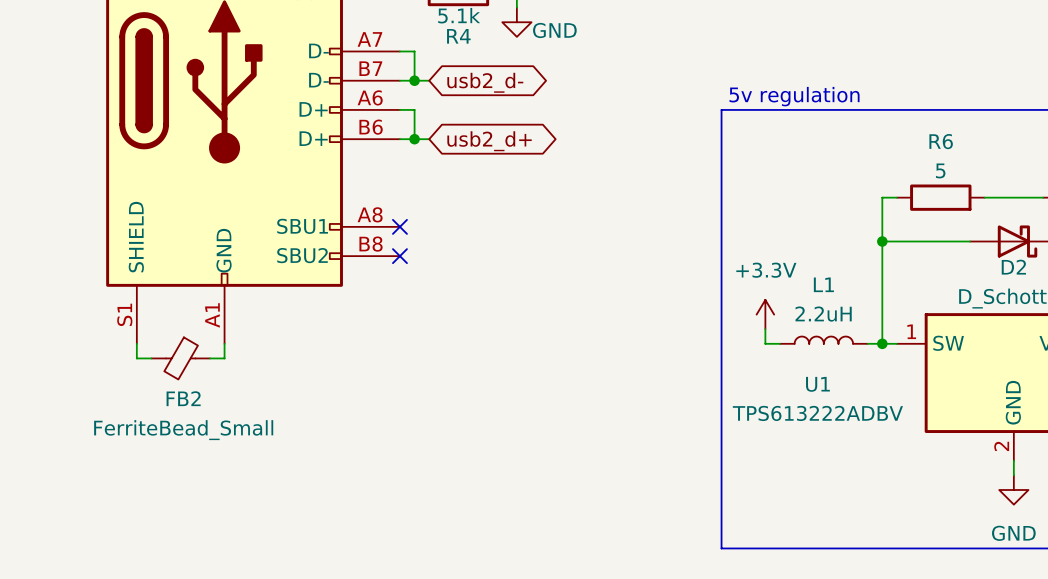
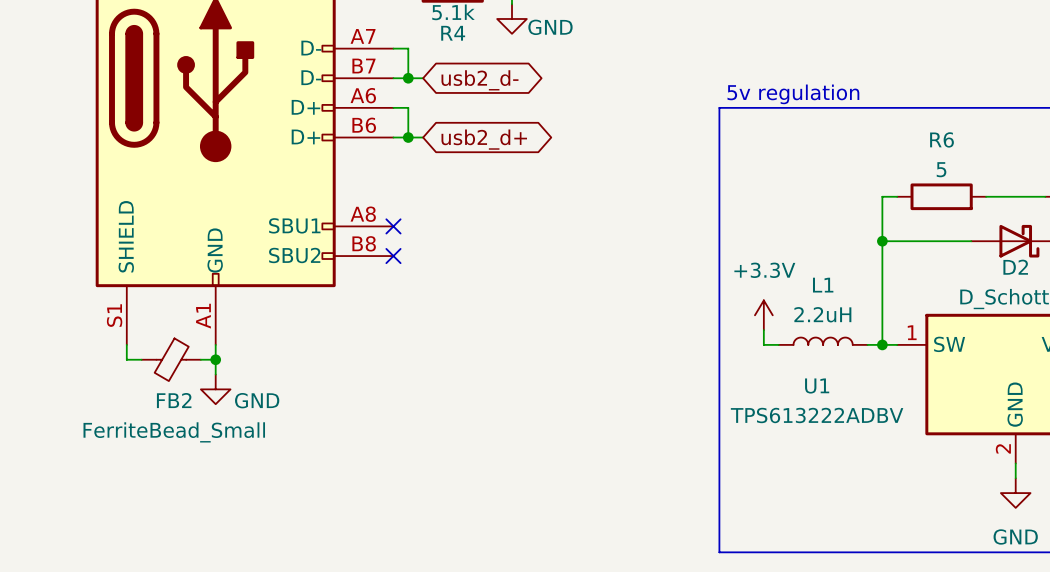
wire: none -> (215, 359) (215, 374)
junction: none -> (215, 359)
power symbol: none -> GND (215, 389)

